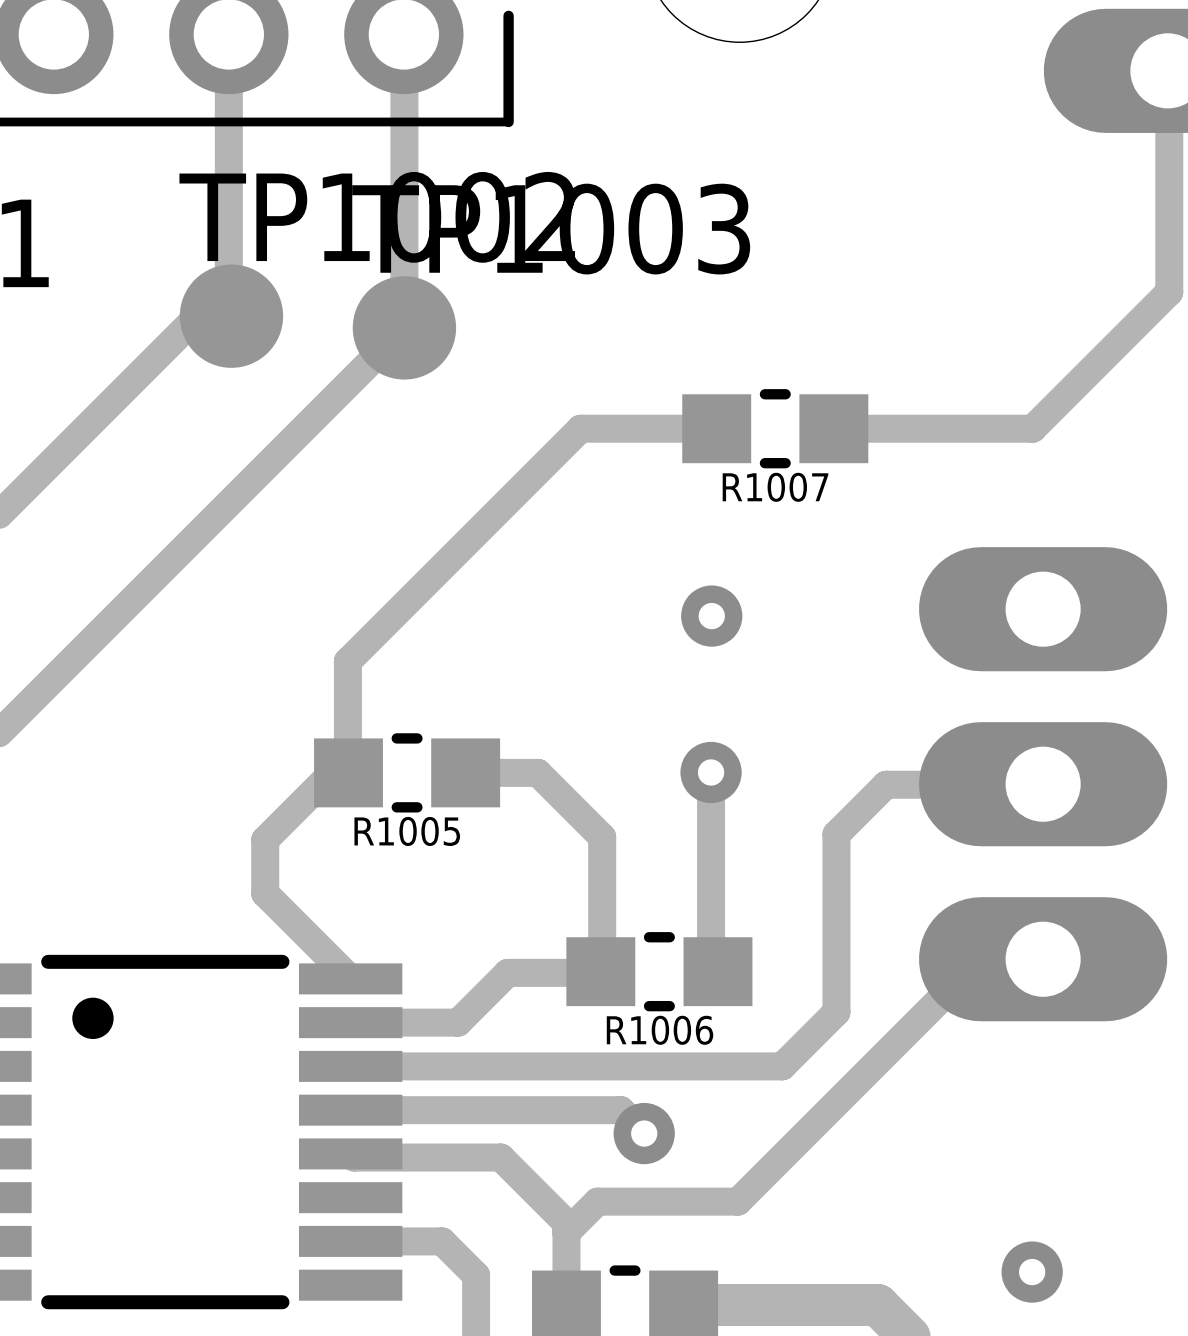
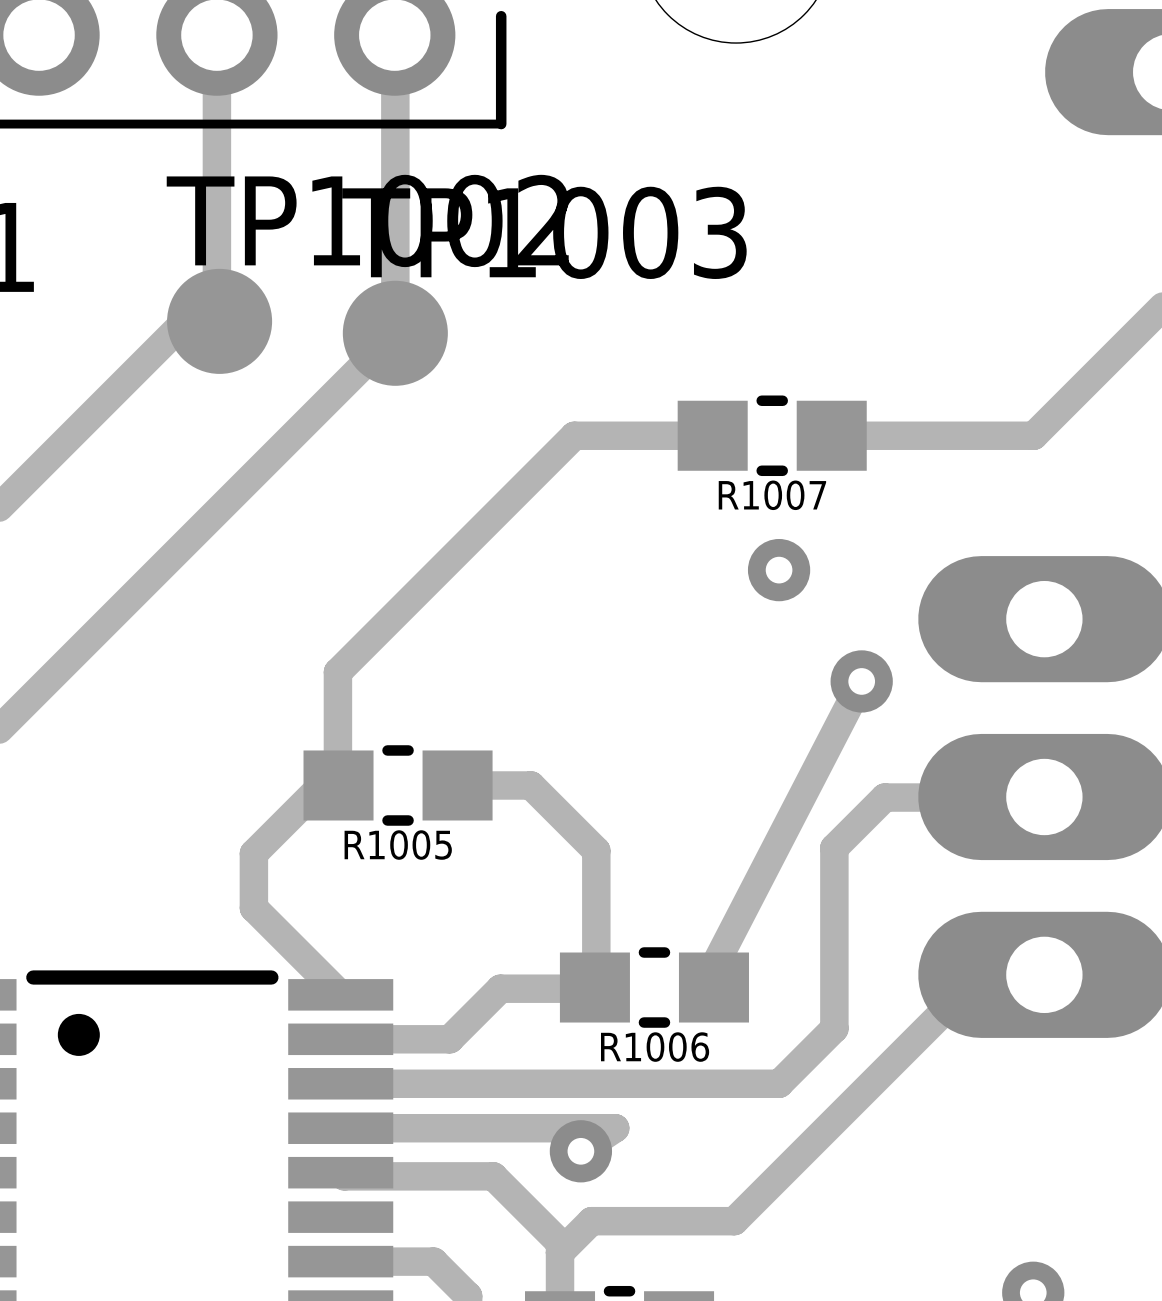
via: none -> (779, 570)
via: (711, 616) -> none
via: none -> (861, 681)
track: (711, 772) (711, 964) -> (861, 681) (706, 980)
via: (711, 772) -> none
via position: (644, 1133) -> (580, 1151)

